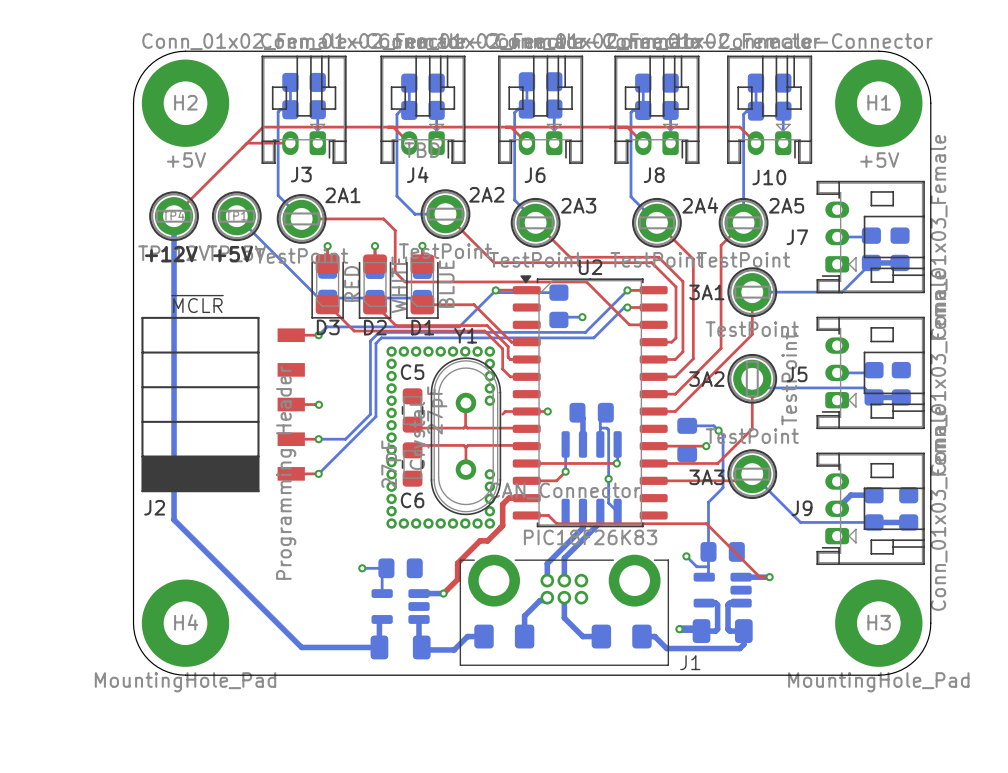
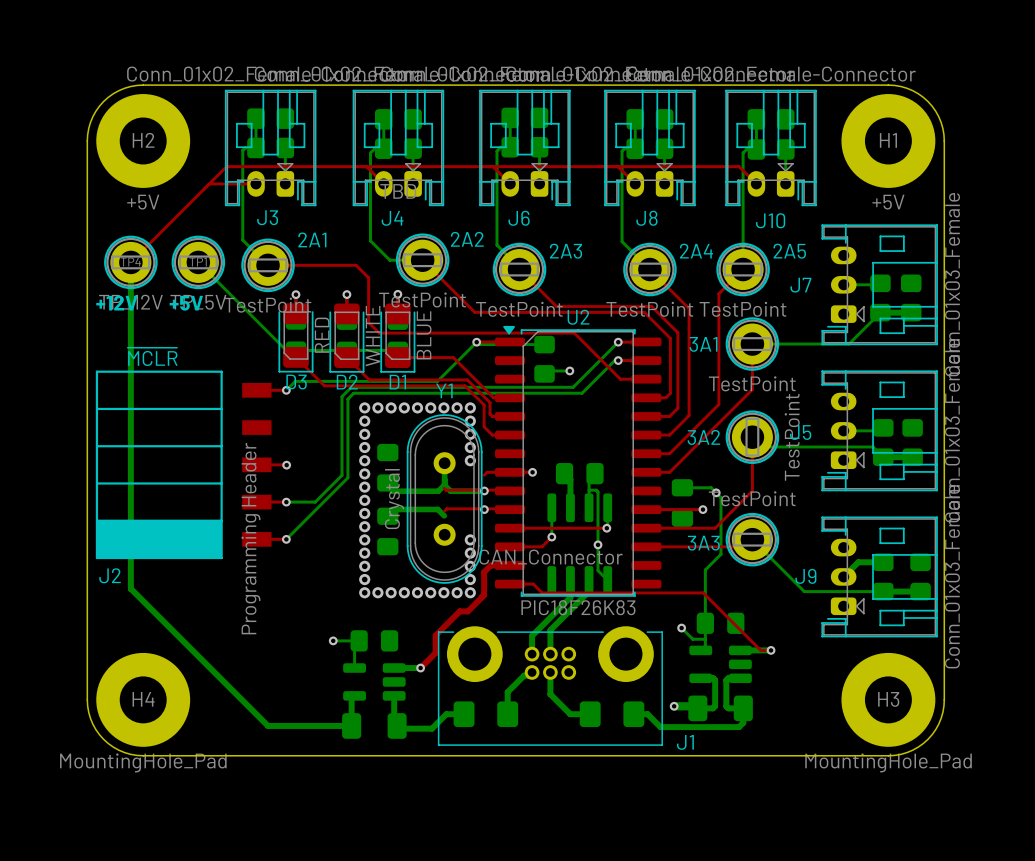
top track: (465, 402) (465, 426) (463, 428) (416, 428) -> none
bottom track: none -> (444, 464) (444, 485) (450, 491) (484, 490)
C5 side: top (412, 410) -> bottom (387, 467)
bottom track: none -> (444, 484) (438, 491) (392, 491) (387, 486)
via: none -> (484, 490)
top track: (416, 445) (463, 445) (465, 447) (465, 469) -> none
bottom track: none -> (391, 509) (437, 509) (444, 515)
via: none -> (484, 509)
C6 side: top (412, 464) -> bottom (387, 531)

